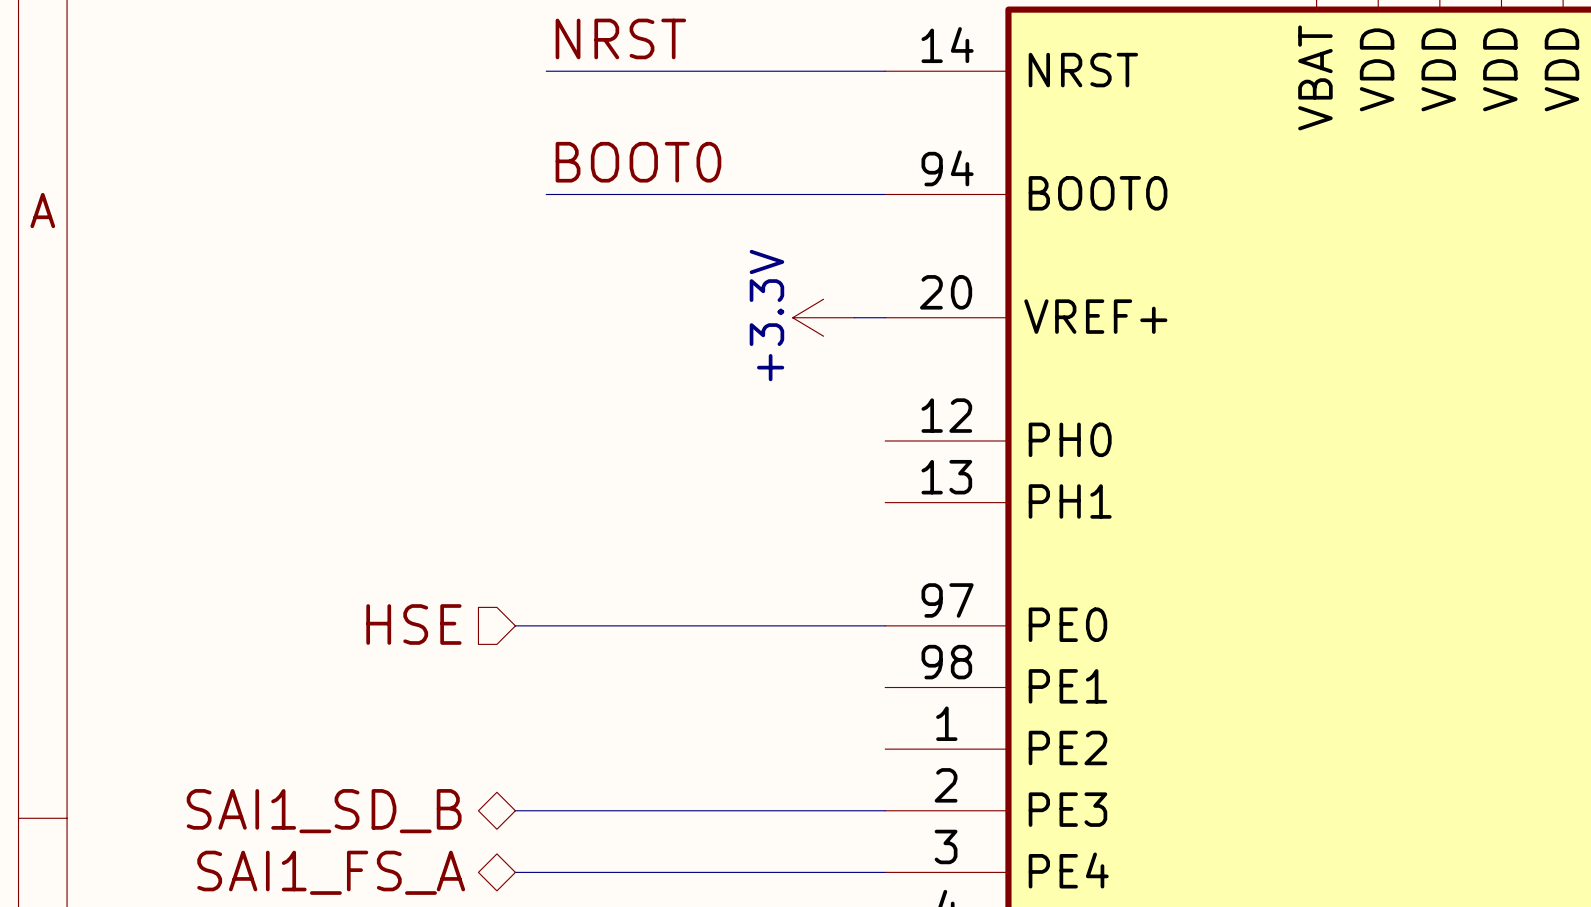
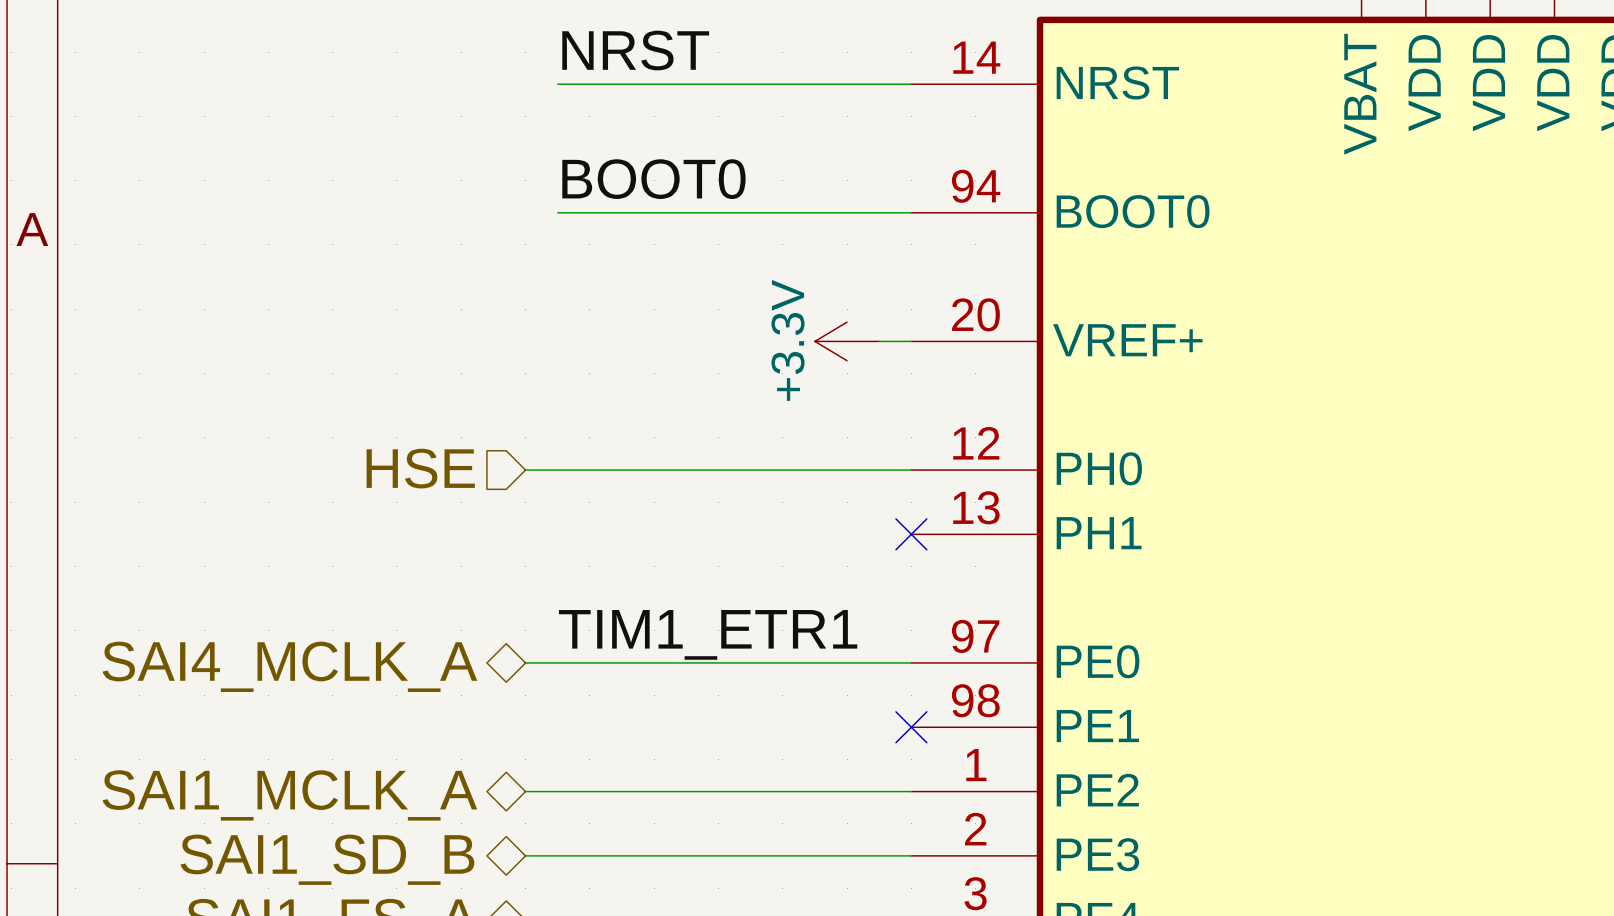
hierarchical label: none -> HSE (420, 468)
wire: none -> (525, 470) (911, 470)
no-connect mark: none -> (911, 534)
label: none -> TIM1_ETR1 (708, 634)
hierarchical label shape: input (413, 624) -> bidirectional (289, 666)
hierarchical label: HSE (413, 624) -> SAI4_MCLK_A (289, 666)
no-connect mark: none -> (911, 727)
hierarchical label: none -> SAI1_MCLK_A (289, 795)
wire: none -> (525, 791) (911, 791)

